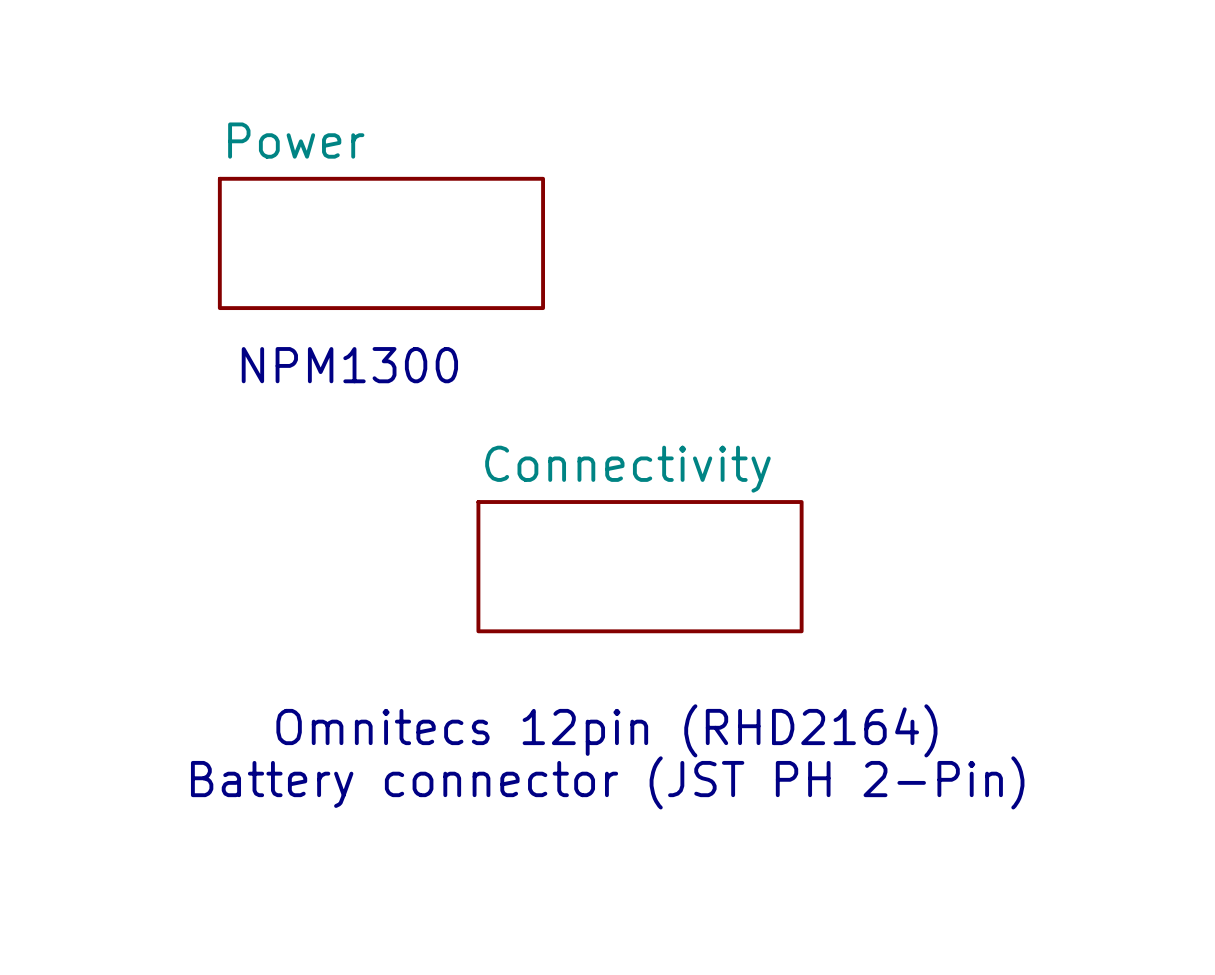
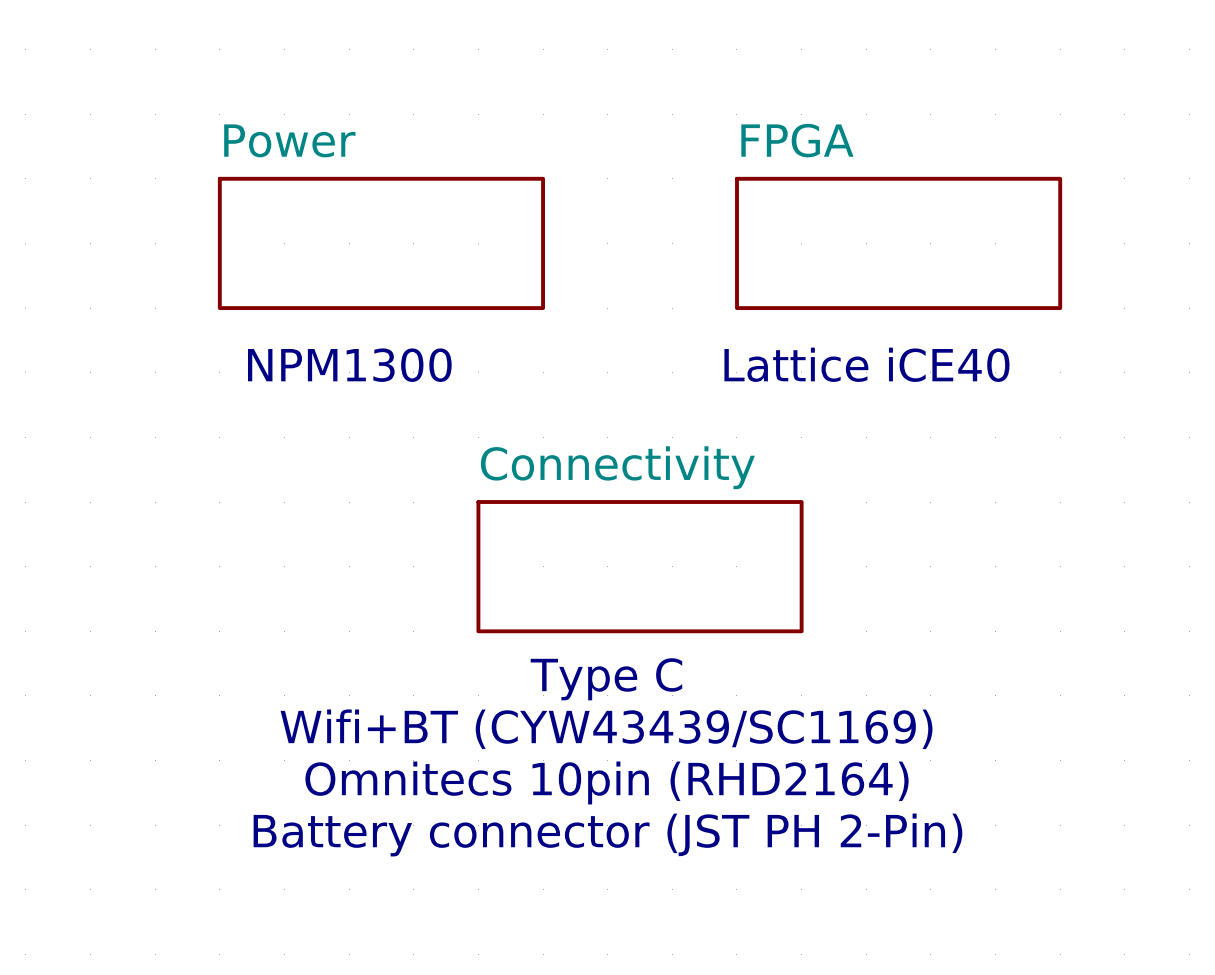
sheet FPGA: none -> (898, 243)
text: none -> Lattice iCE40 (866, 364)
text: none -> Type C (606, 679)
text: Omnitecs 12pin (RHD2164) (606, 730) -> Wifi+BT (CYW43439/SC1169) (606, 729)
text: Battery connector (JST PH 2-Pin) (607, 782) -> Omnitecs 10pin (RHD2164) (607, 782)
text: none -> Battery connector (JST PH 2-Pin) (607, 835)

